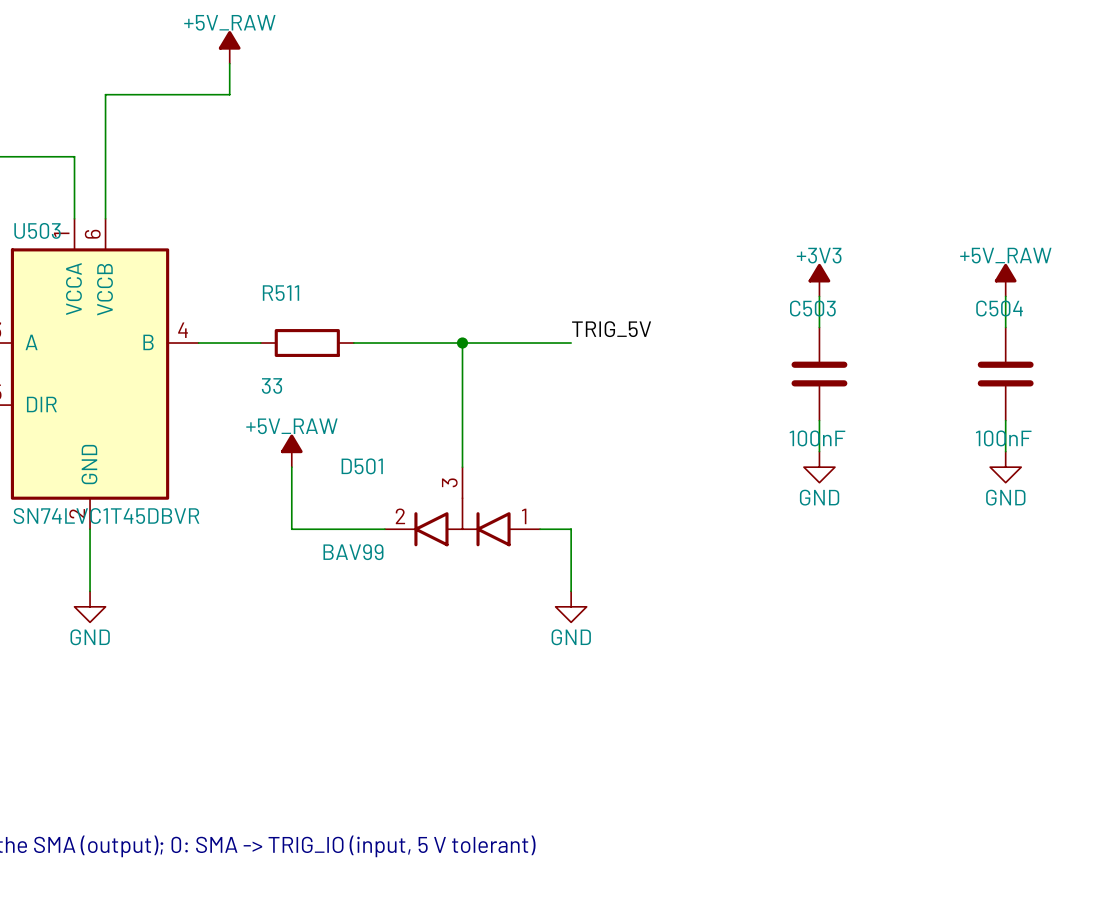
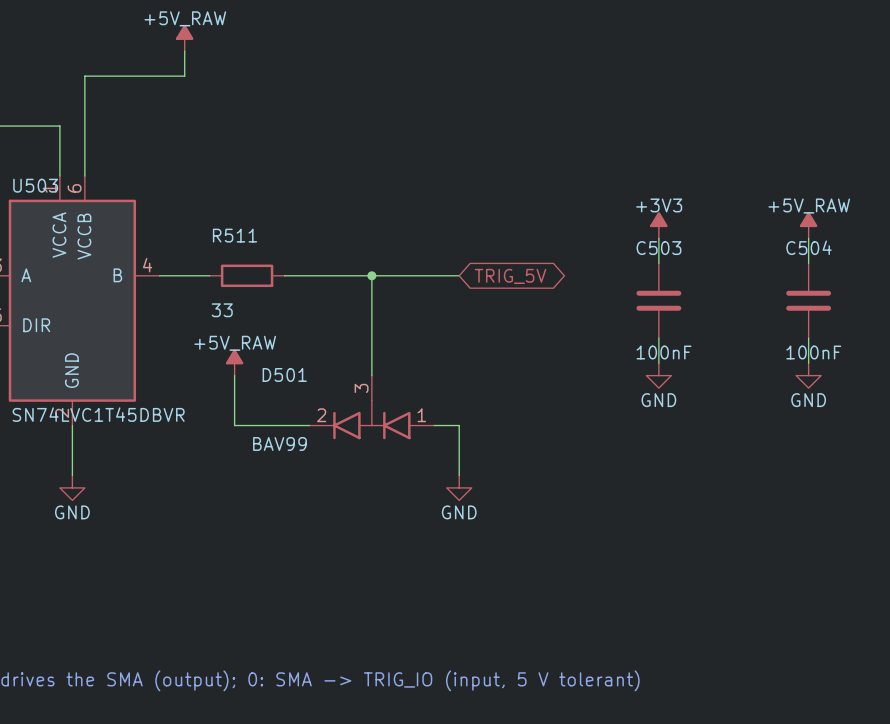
label: TRIG_5V (611, 329) -> none
global label: none -> TRIG_5V (510, 276)

